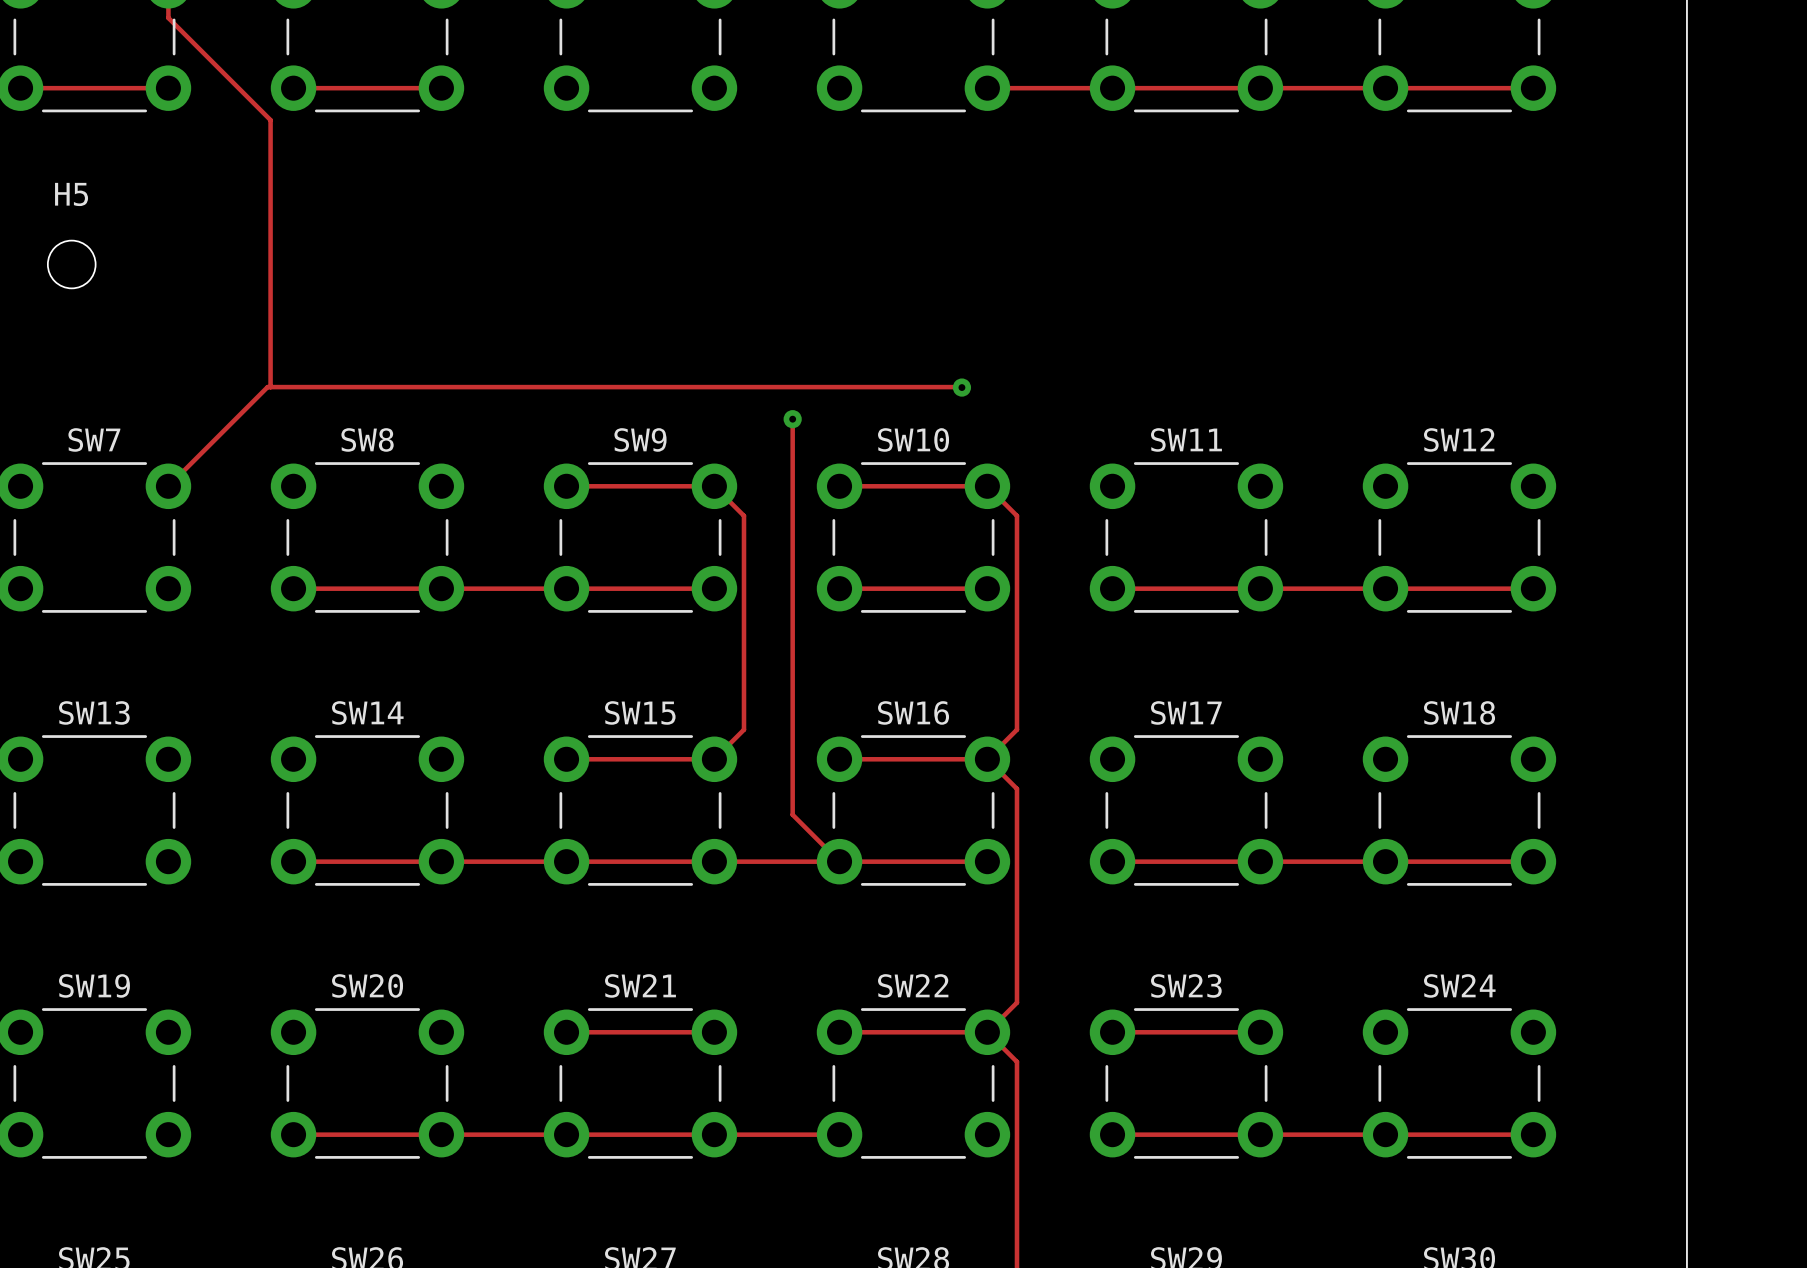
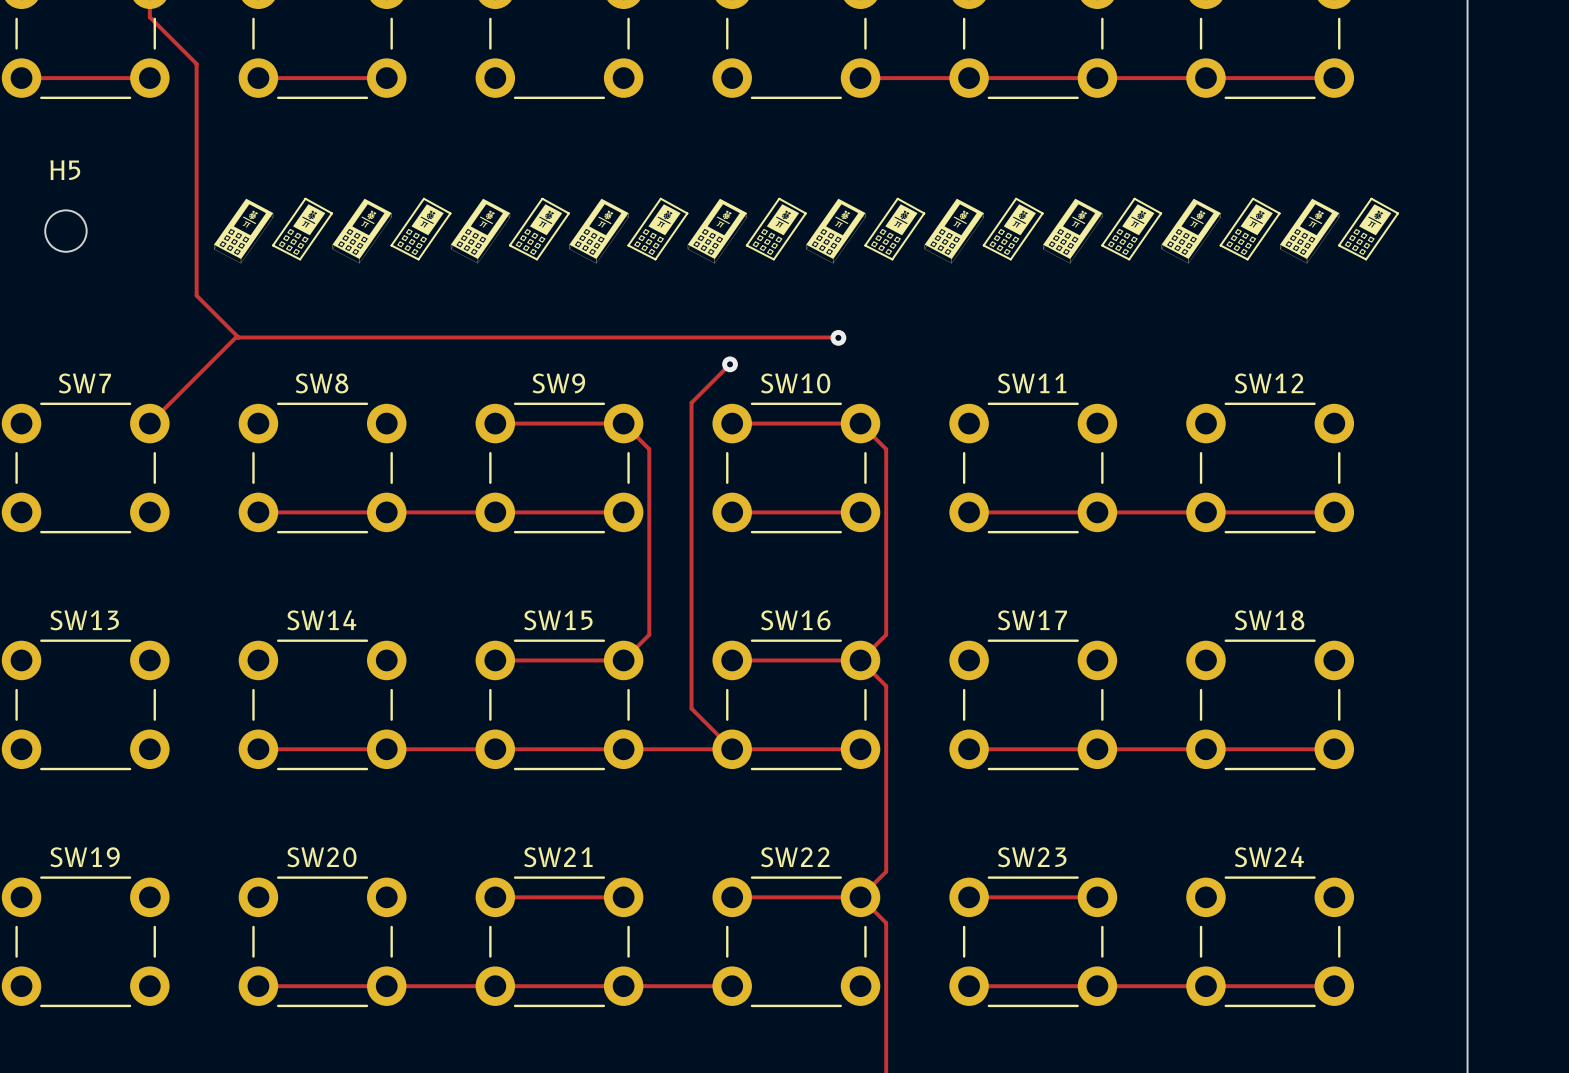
track: (222, 71) (270, 120) (270, 387) -> (196, 63) (196, 295) (238, 337)
drawing: none -> [214, 197, 1400, 264]
track: (792, 419) (792, 462) -> (730, 364) (691, 402)
via position: (792, 419) -> (730, 364)

